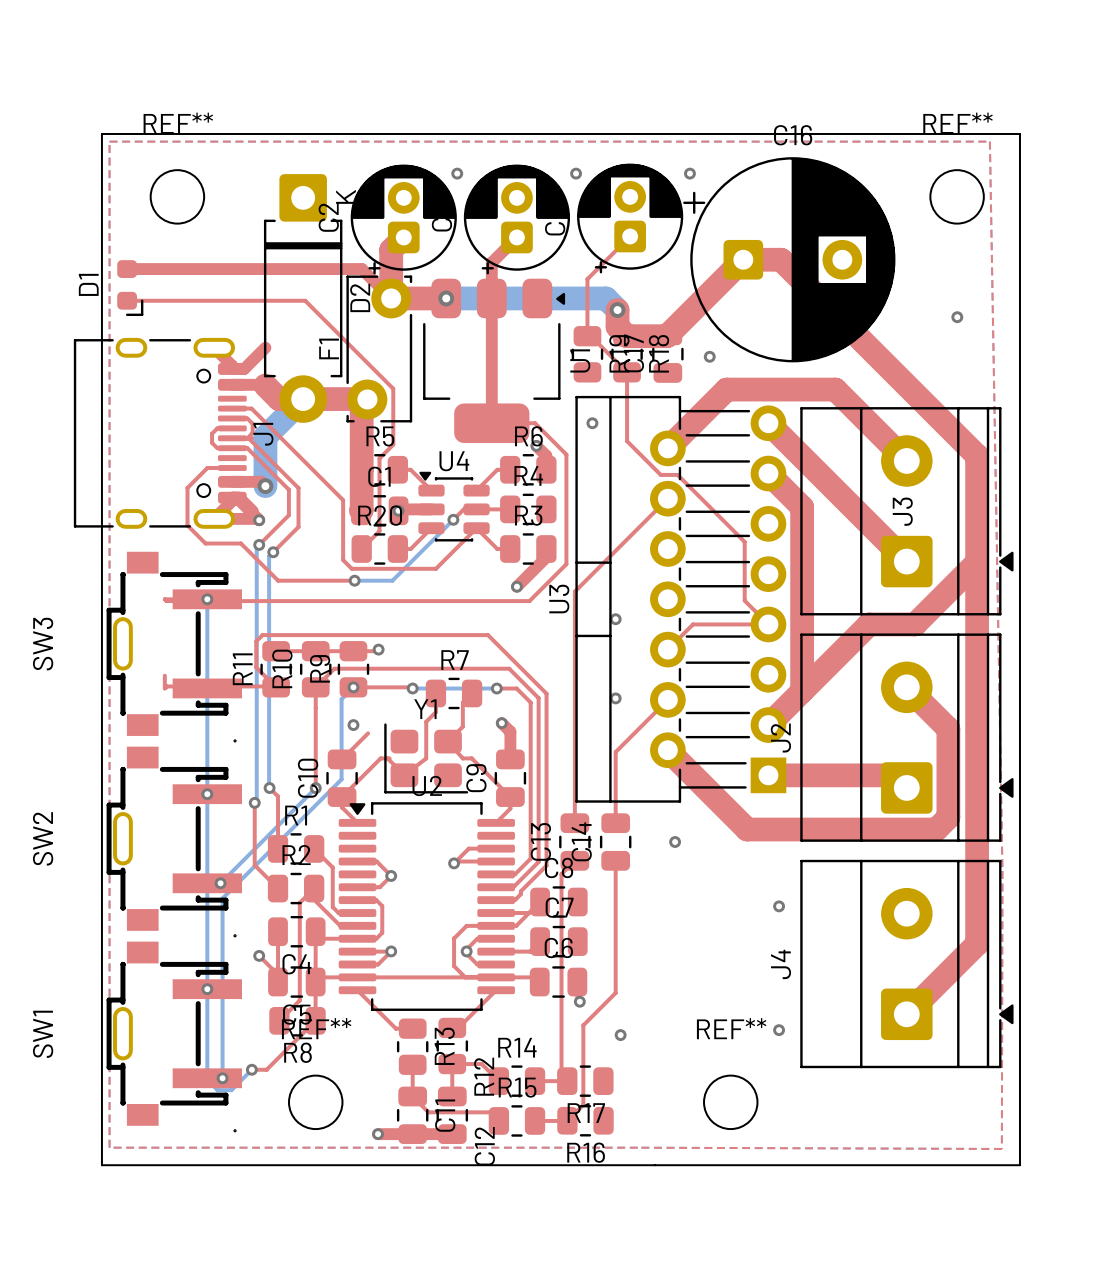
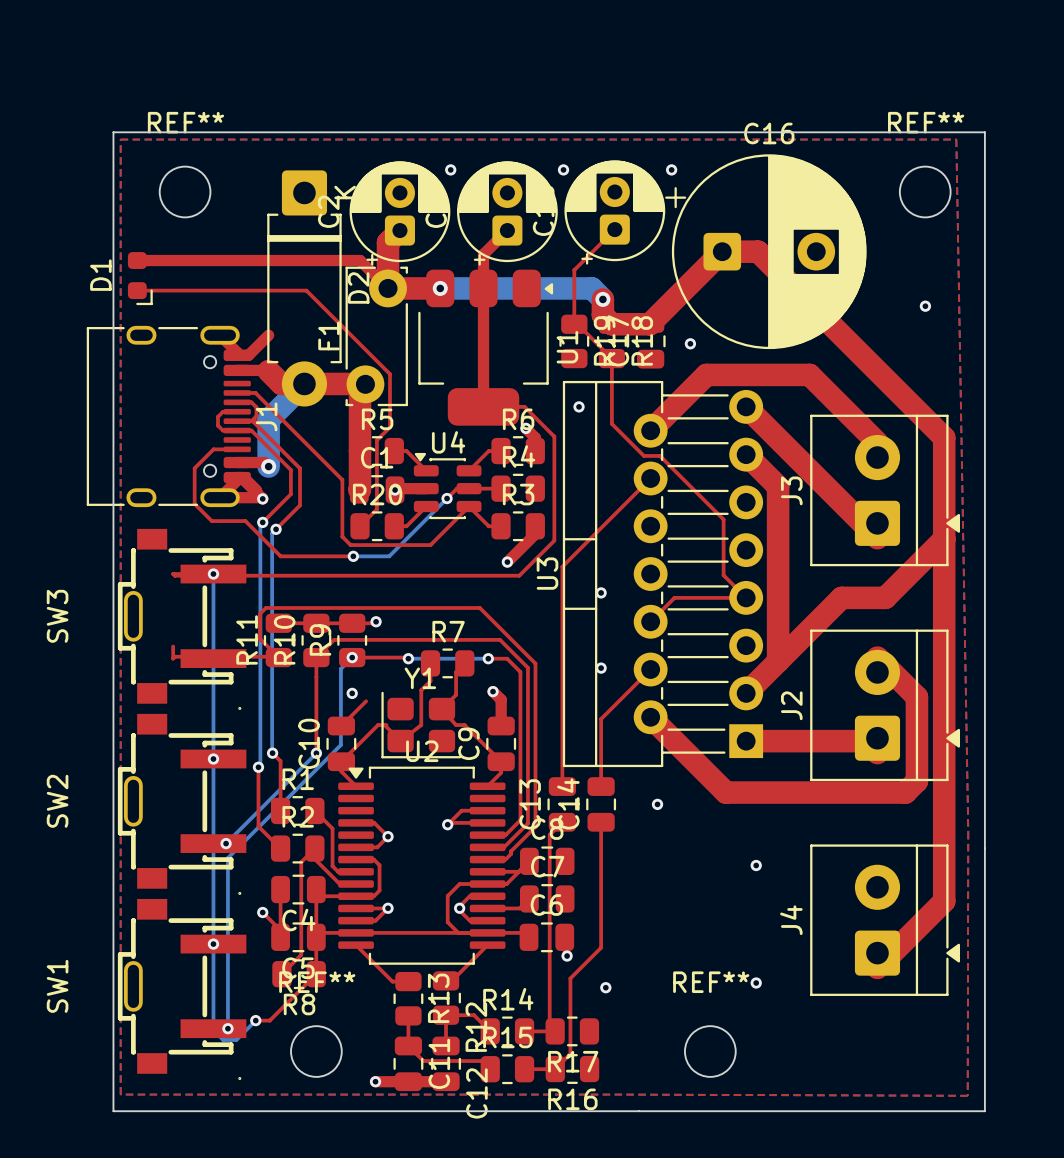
J3 footprint: [800, 407, 1014, 616] -> [810, 414, 961, 567]
J3 name position: J3 (902, 511) -> J3 (791, 490)
J2 footprint: [800, 633, 1014, 842] -> [810, 629, 961, 782]
J4 footprint: [800, 859, 1014, 1069] -> [810, 844, 961, 996]

